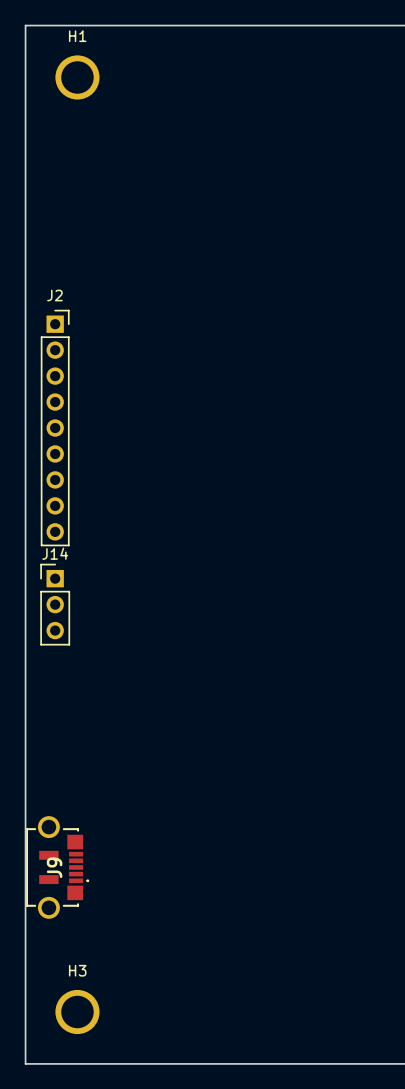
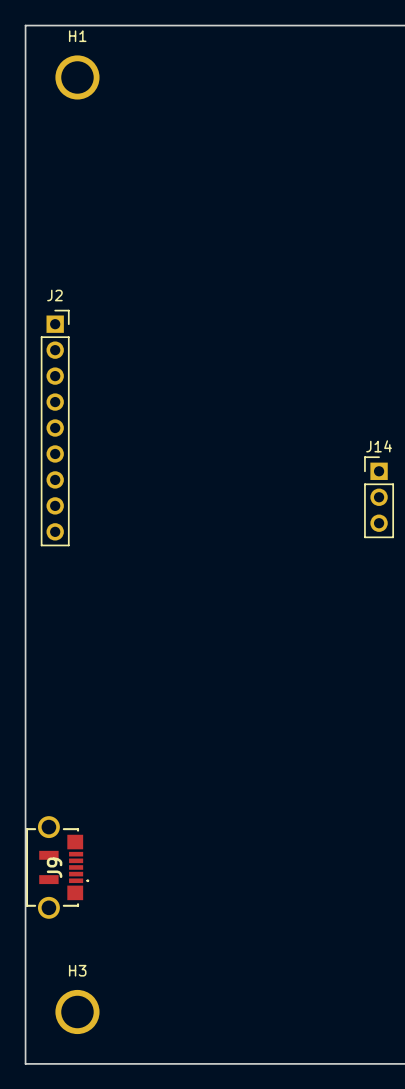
J14 position: (55, 604) -> (379, 497)

